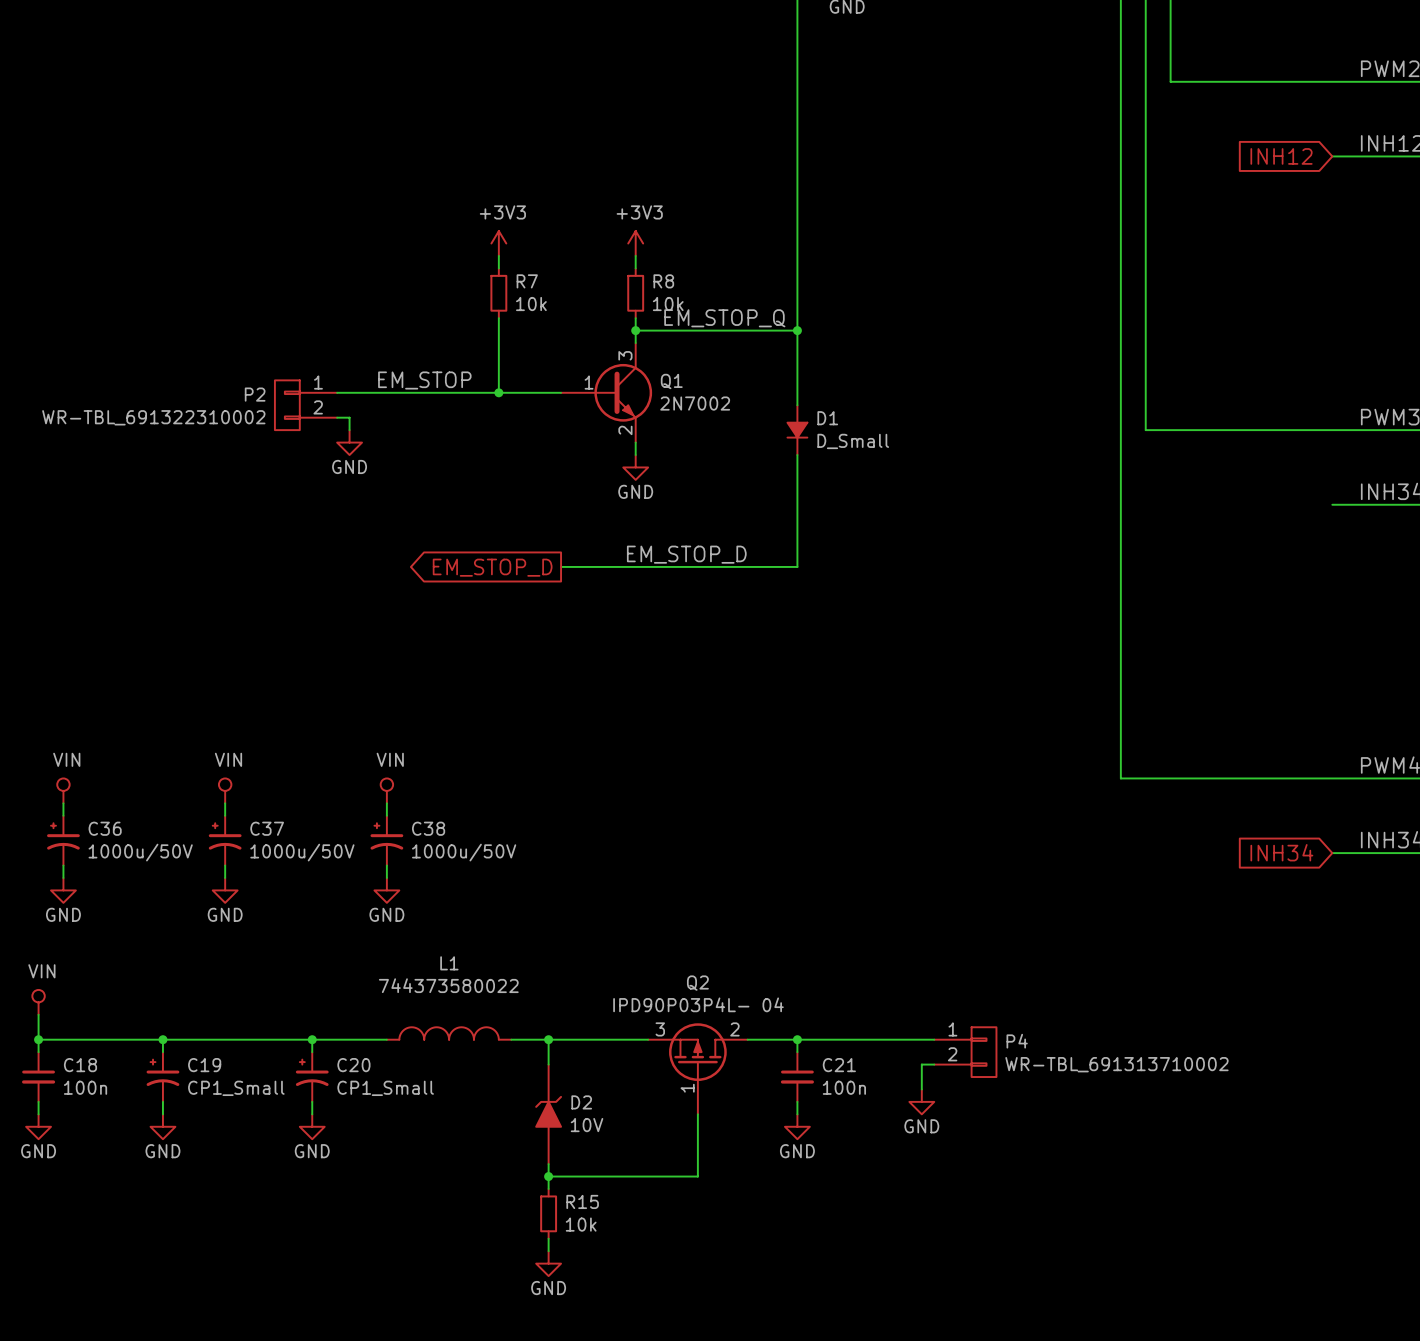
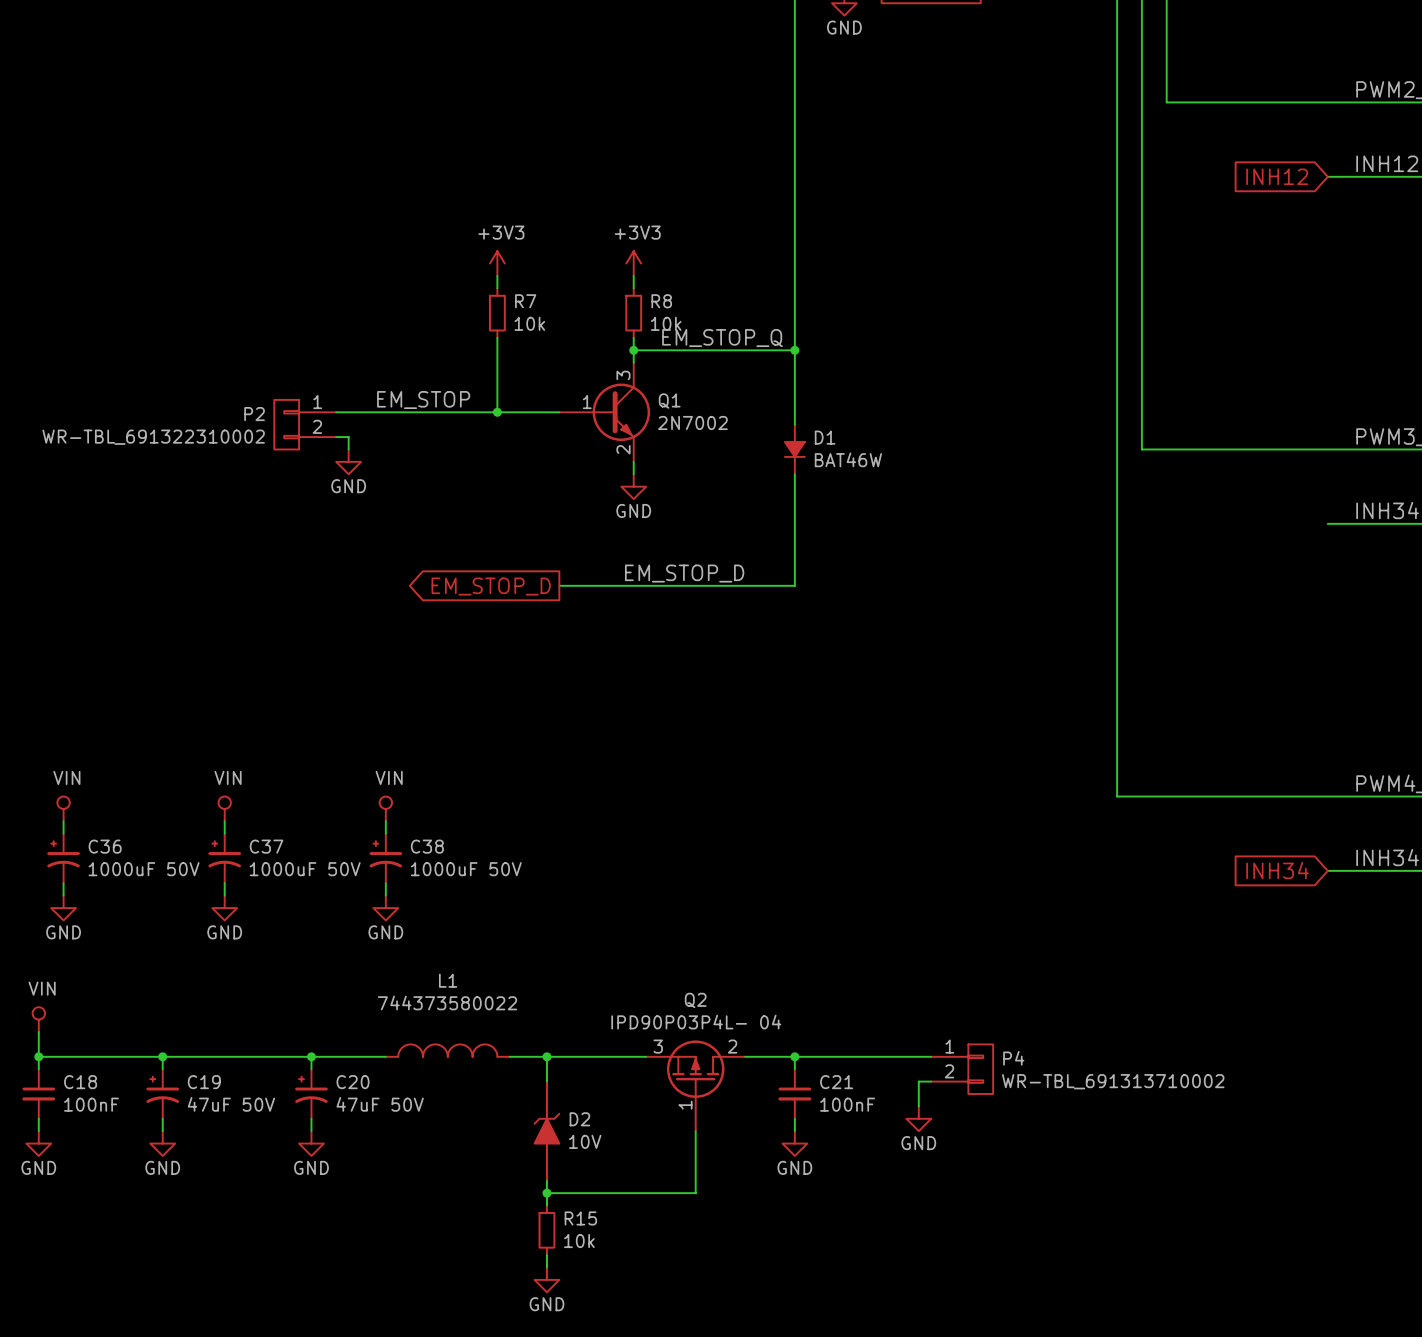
D1 value: D_Small (853, 441) -> BAT46W (848, 459)
C36 value: 1000u/50V (140, 852) -> 1000uF 50V (144, 869)
C37 value: 1000u/50V (302, 852) -> 1000uF 50V (305, 869)
C38 value: 1000u/50V (464, 852) -> 1000uF 50V (466, 869)
C18 value: 100n (85, 1087) -> 100nF (91, 1104)
C21 value: 100n (844, 1087) -> 100nF (847, 1104)
C19 value: CP1_Small (236, 1088) -> 47uF 50V (231, 1104)
C20 value: CP1_Small (385, 1088) -> 47uF 50V (380, 1104)

